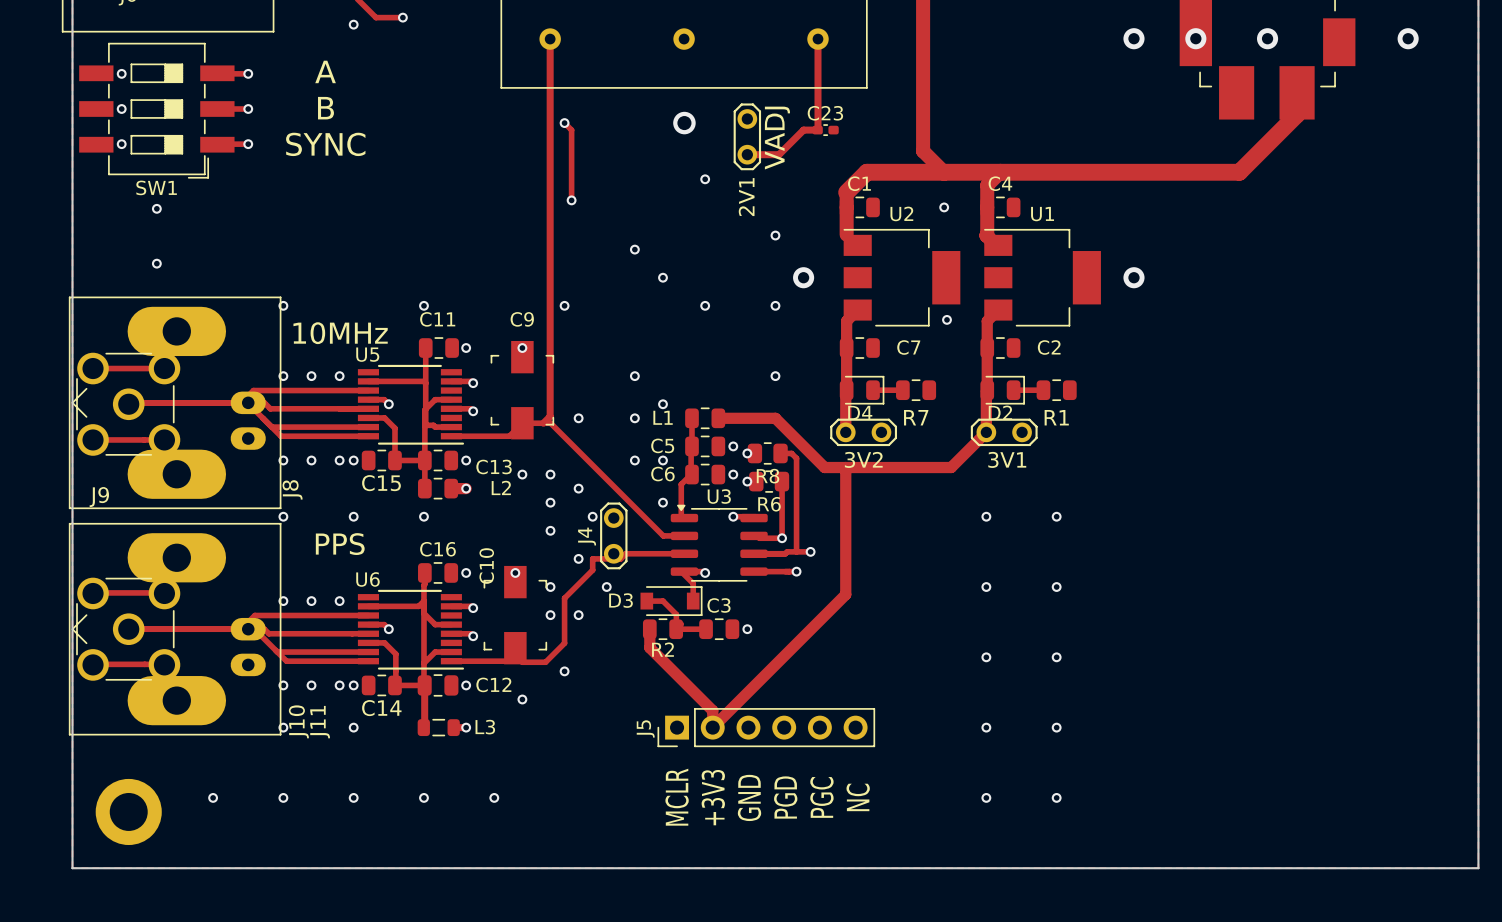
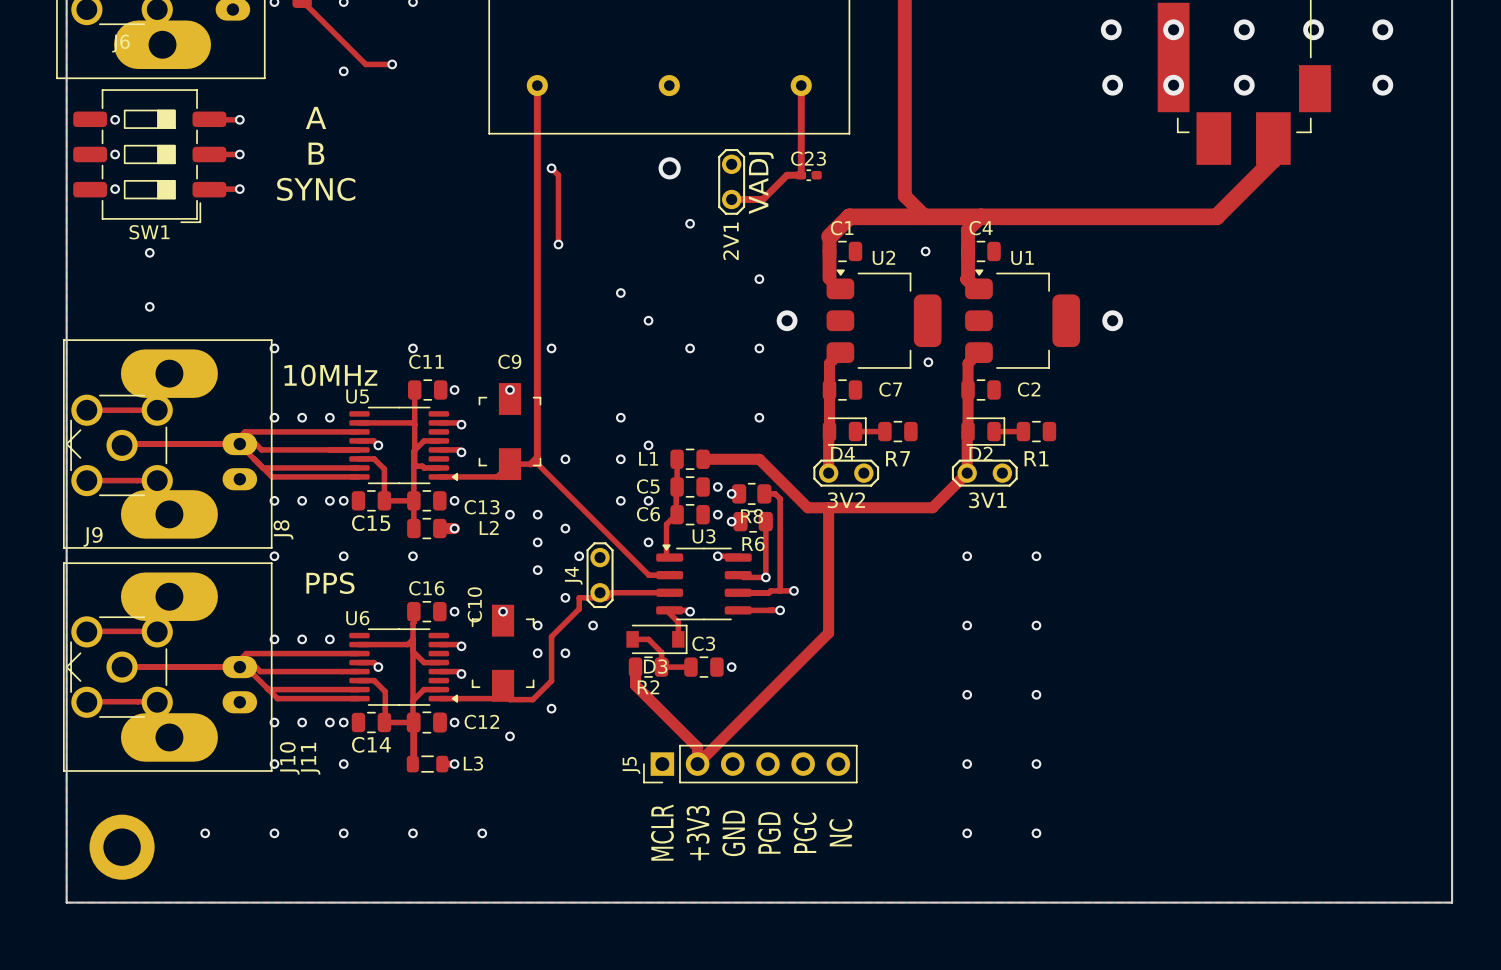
SW1 footprint: [79, 42, 235, 179] -> [73, 89, 227, 224]
U2 footprint: [843, 228, 961, 327] -> [826, 269, 942, 369]
U1 footprint: [984, 228, 1101, 327] -> [965, 269, 1081, 369]
U5 footprint: [357, 364, 465, 445] -> [349, 406, 459, 485]
U6 footprint: [357, 589, 465, 670] -> [349, 628, 459, 706]
D3 name position: D3 (620, 600) -> D3 (655, 666)

